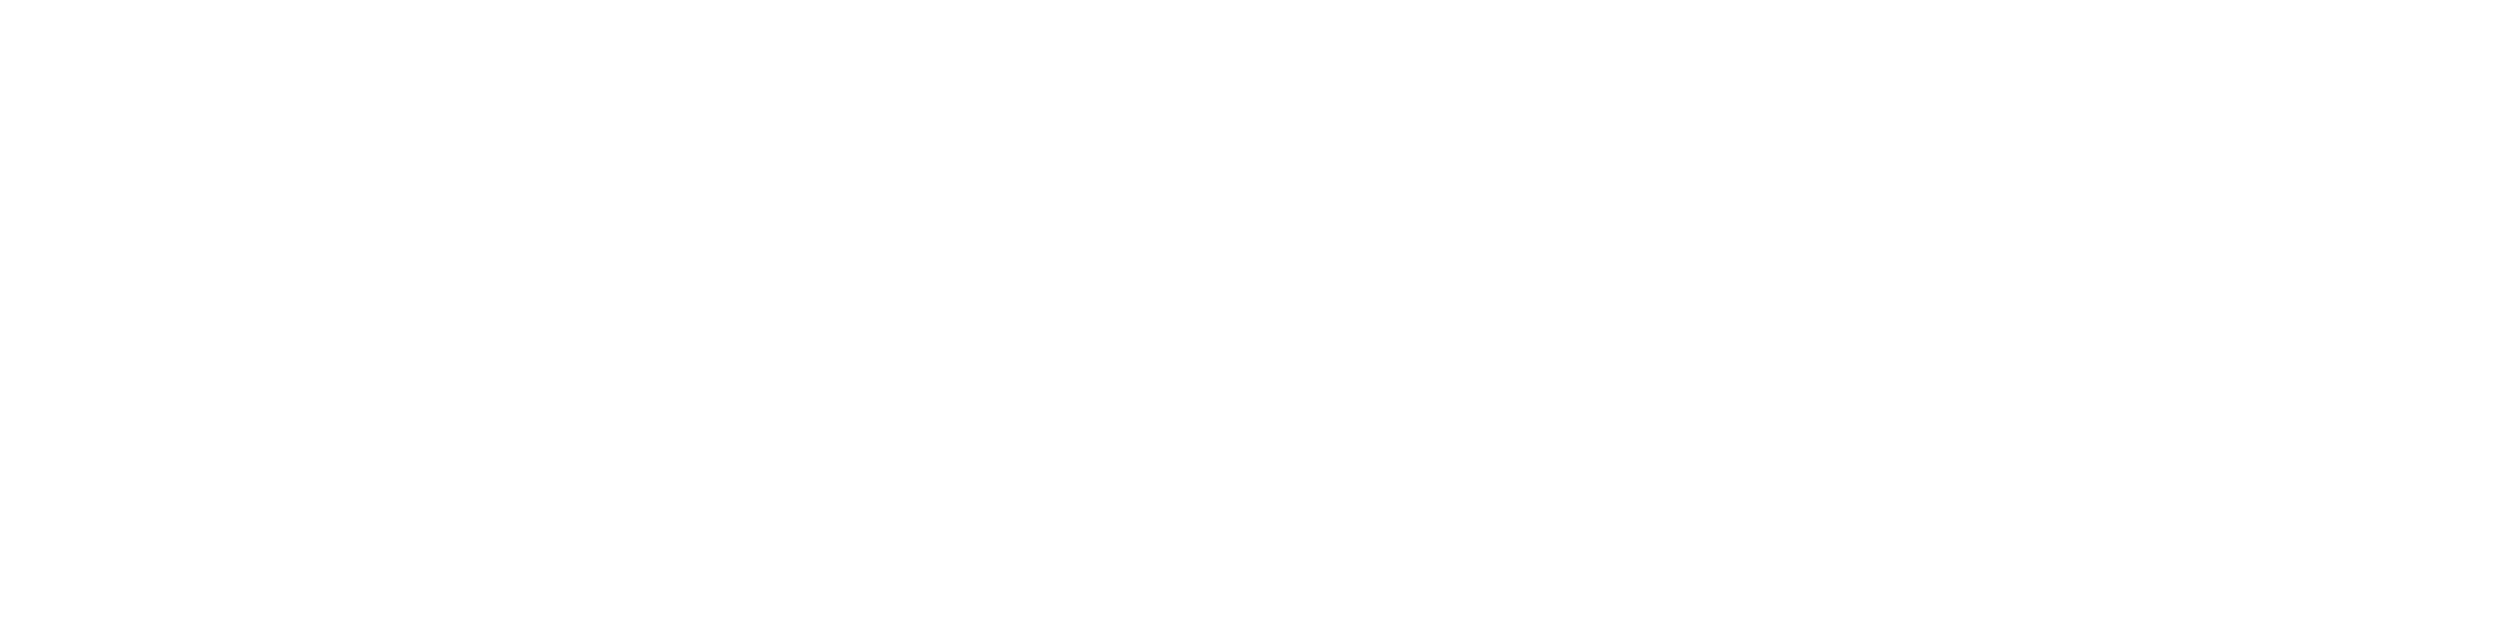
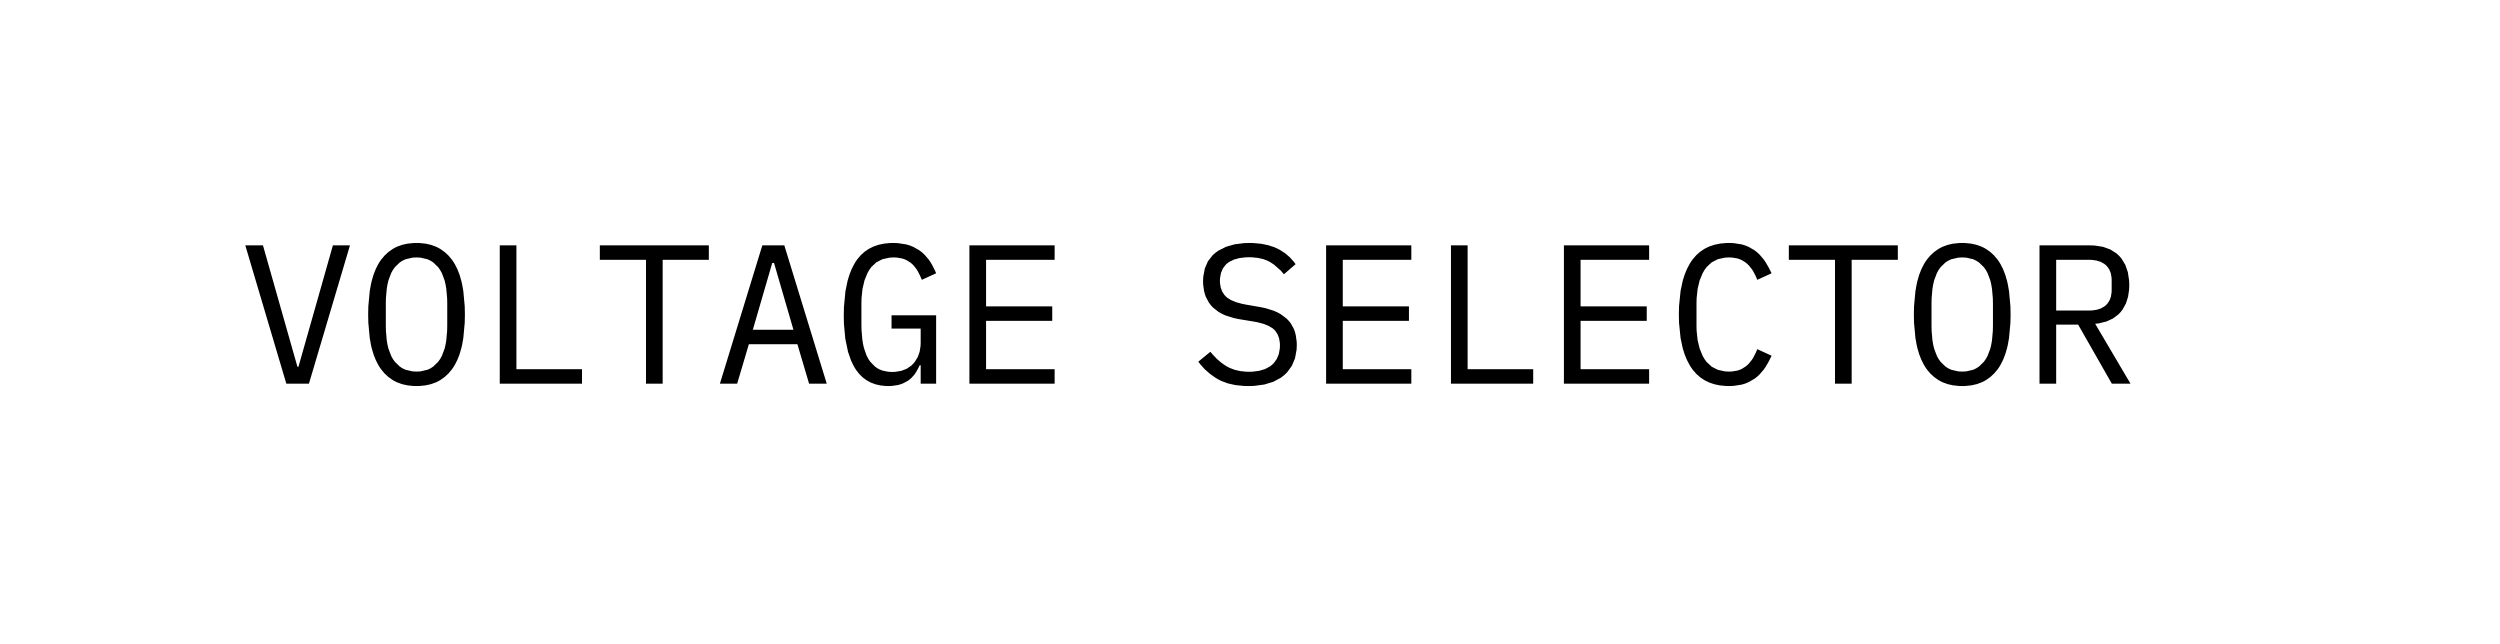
text: none -> VOLTAGE SELECTOR (1187, 314)

